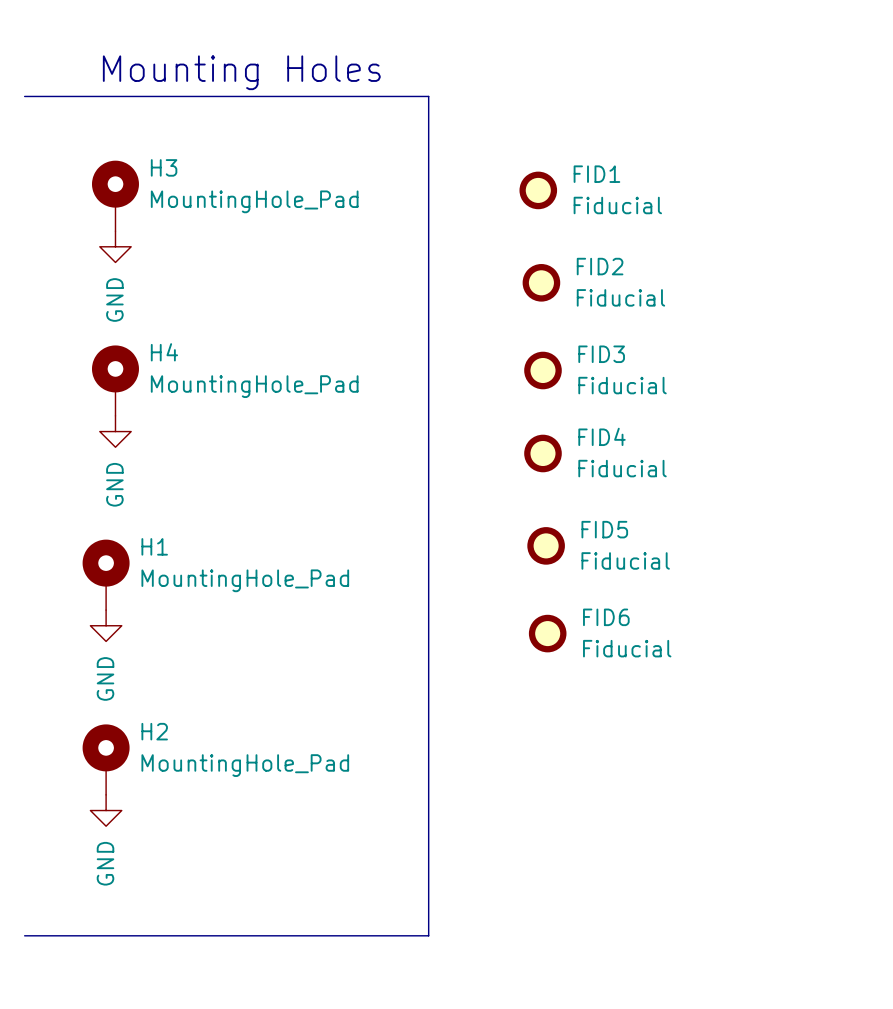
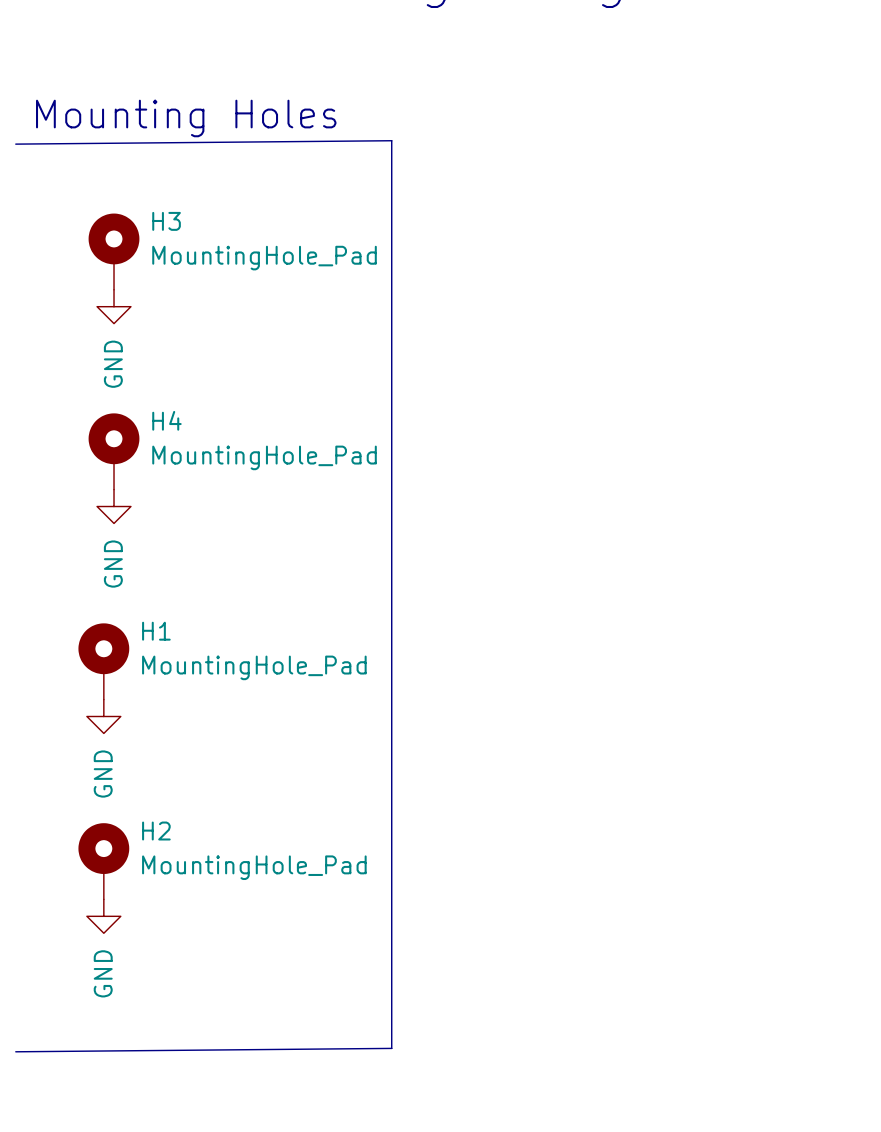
text position: Mounting Holes (241, 72) -> Mounting Holes (186, 118)
line: (24, 96) (428, 96) (428, 935) (24, 935) -> (15, 144) (391, 140) (391, 1048) (15, 1051)
FID1: Fiducial (538, 190) -> none
FID2: Fiducial (541, 282) -> none
FID3: Fiducial (542, 370) -> none
FID4: Fiducial (542, 453) -> none
FID5: Fiducial (546, 545) -> none
FID6: Fiducial (547, 633) -> none

